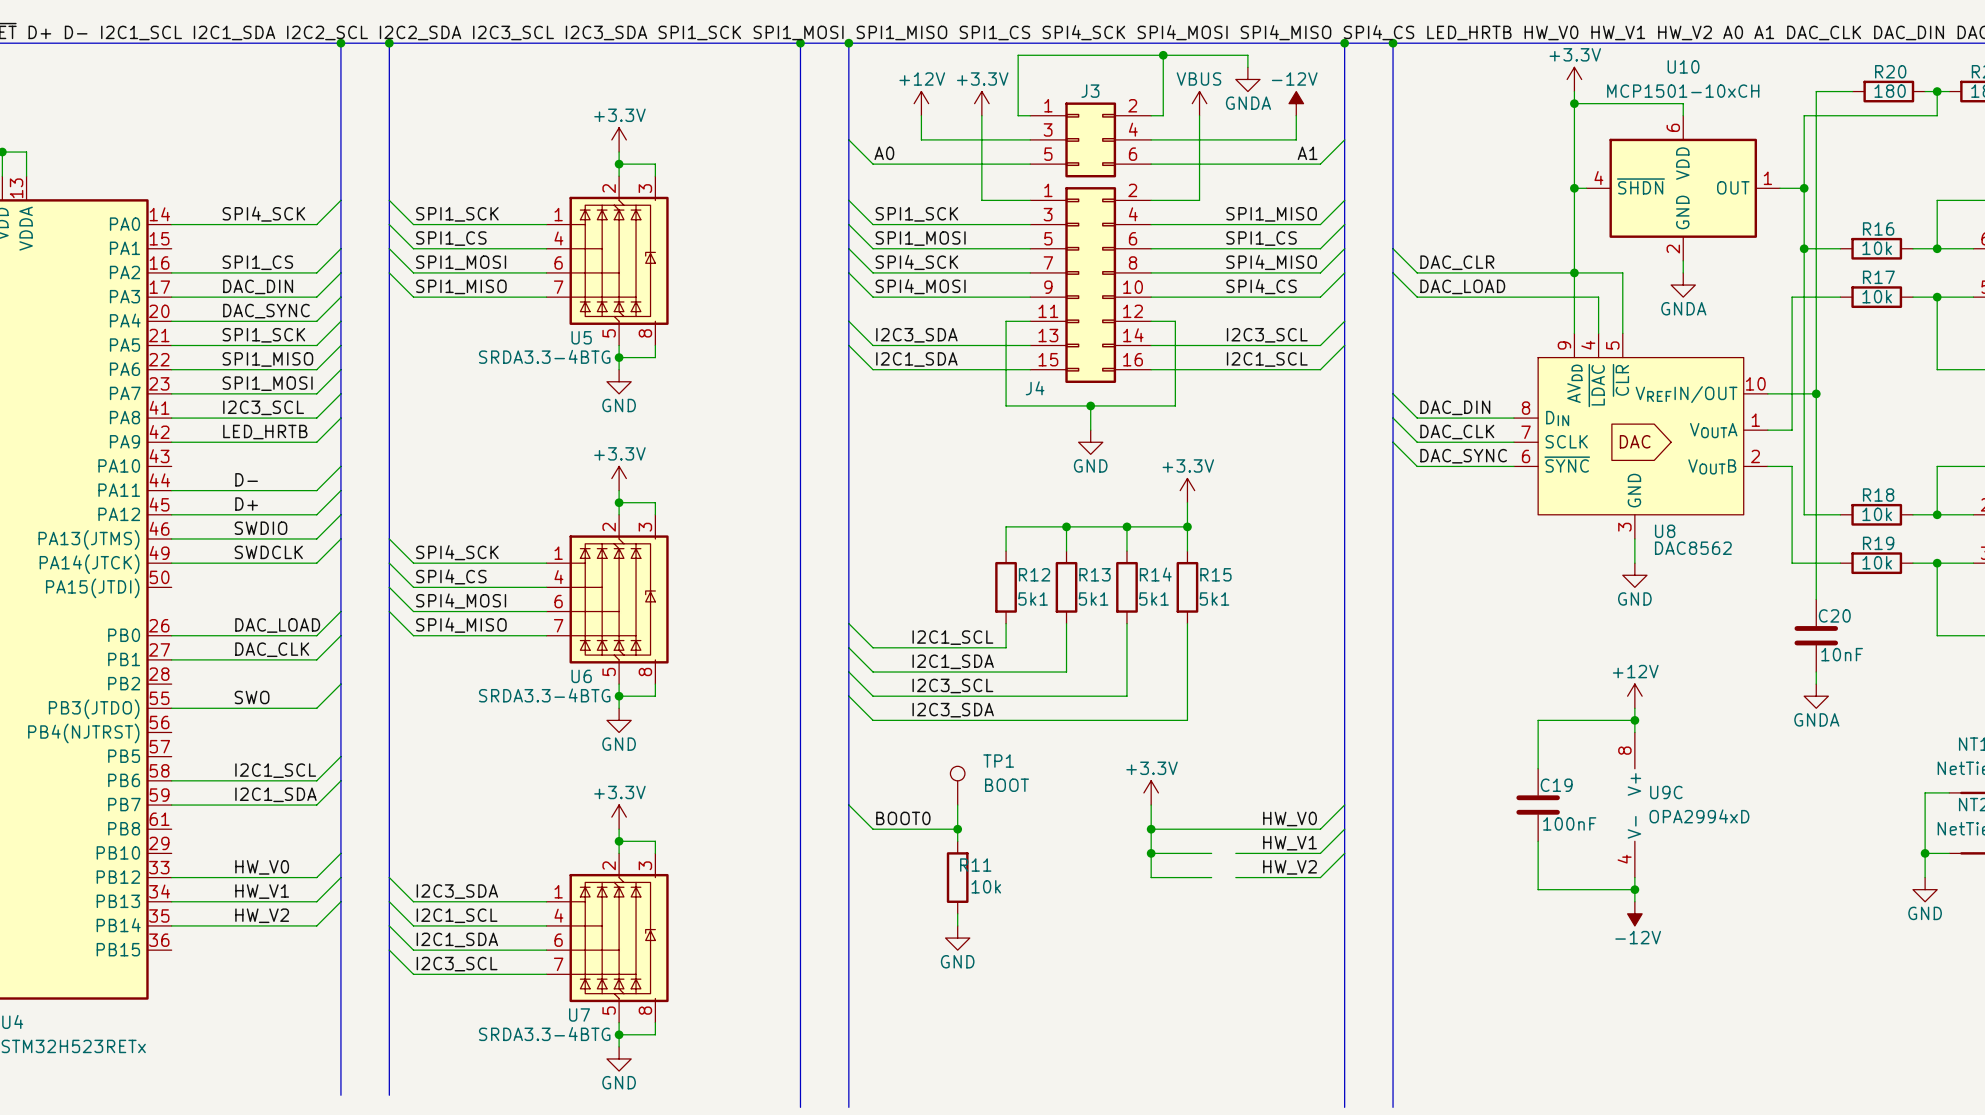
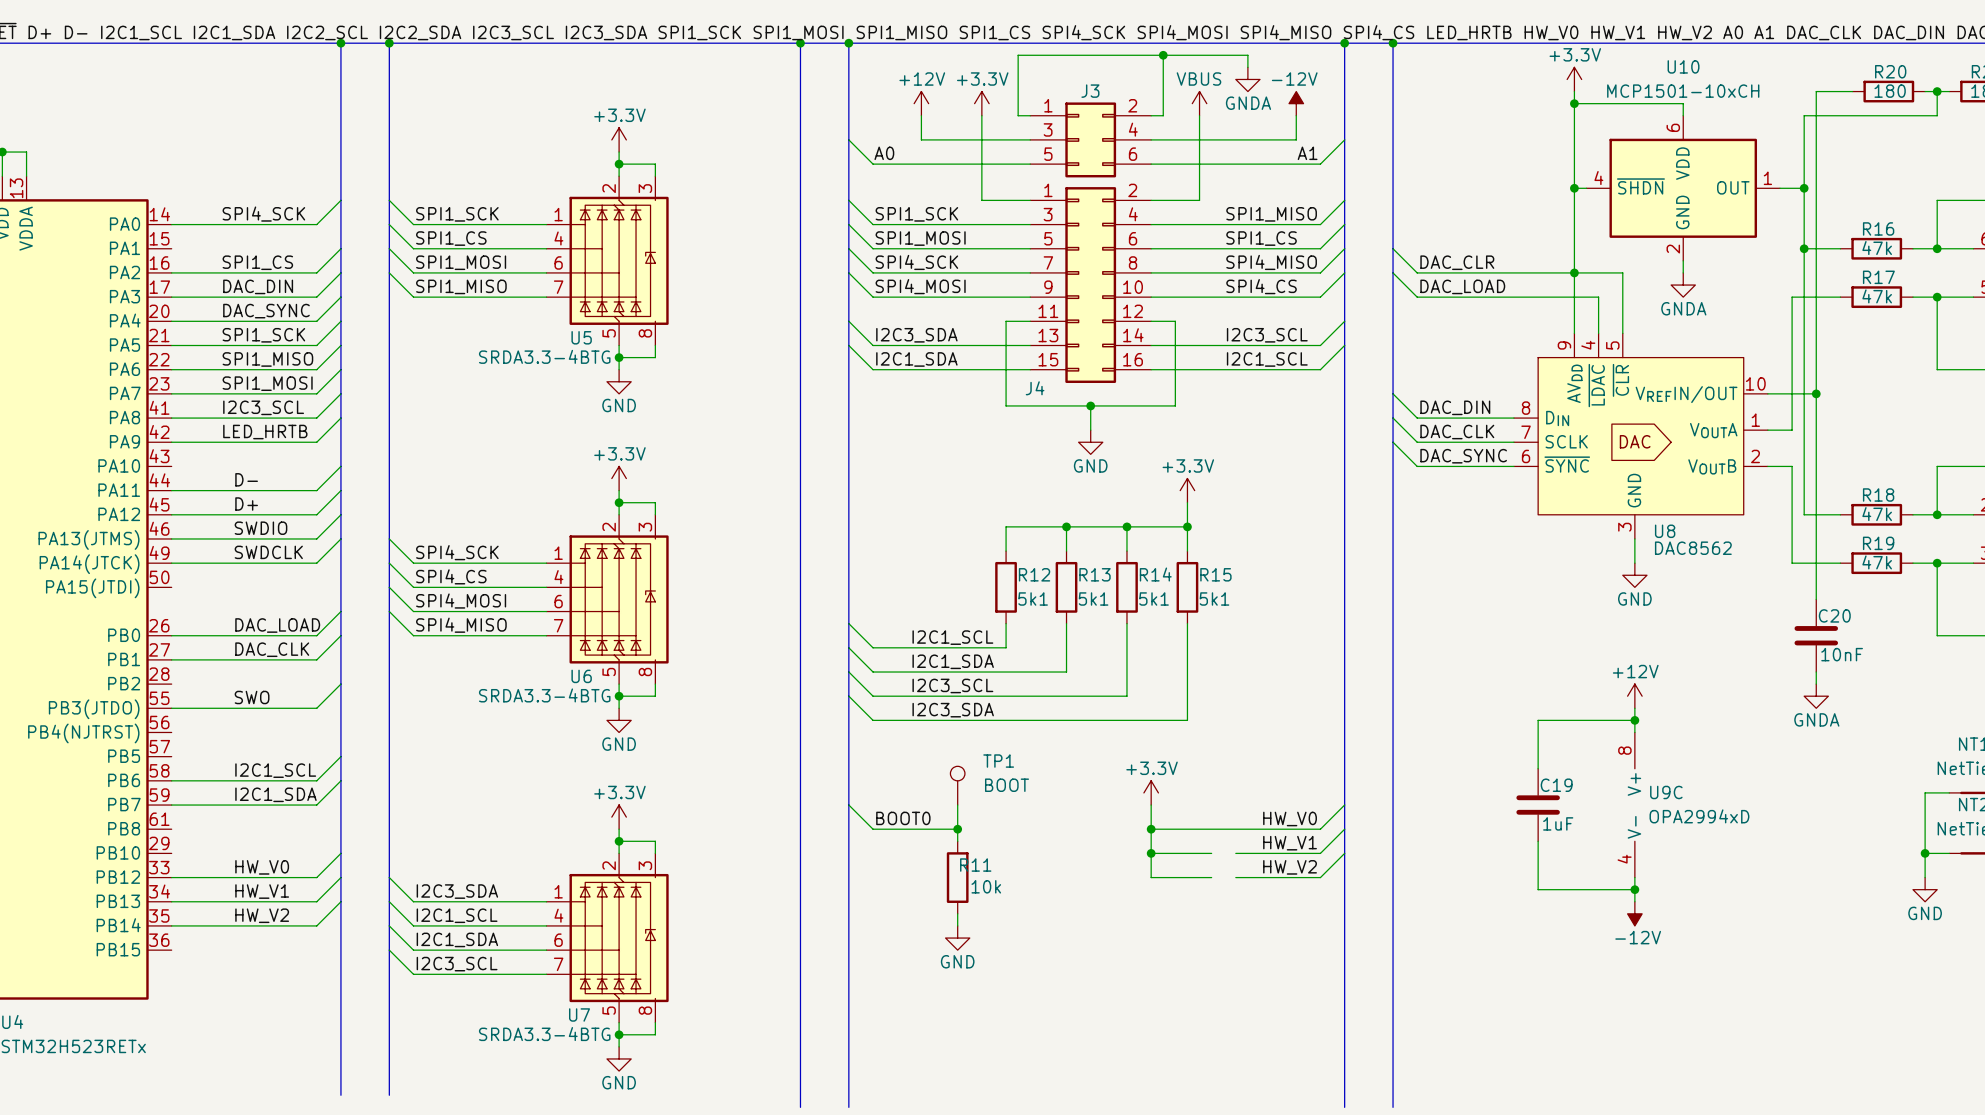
R16 value: 10k (1877, 248) -> 47k (1877, 248)
R17 value: 10k (1877, 296) -> 47k (1877, 296)
R18 value: 10k (1877, 514) -> 47k (1877, 514)
R19 value: 10k (1877, 562) -> 47k (1877, 562)
C19 value: 100nF (1569, 823) -> 1uF (1558, 823)

